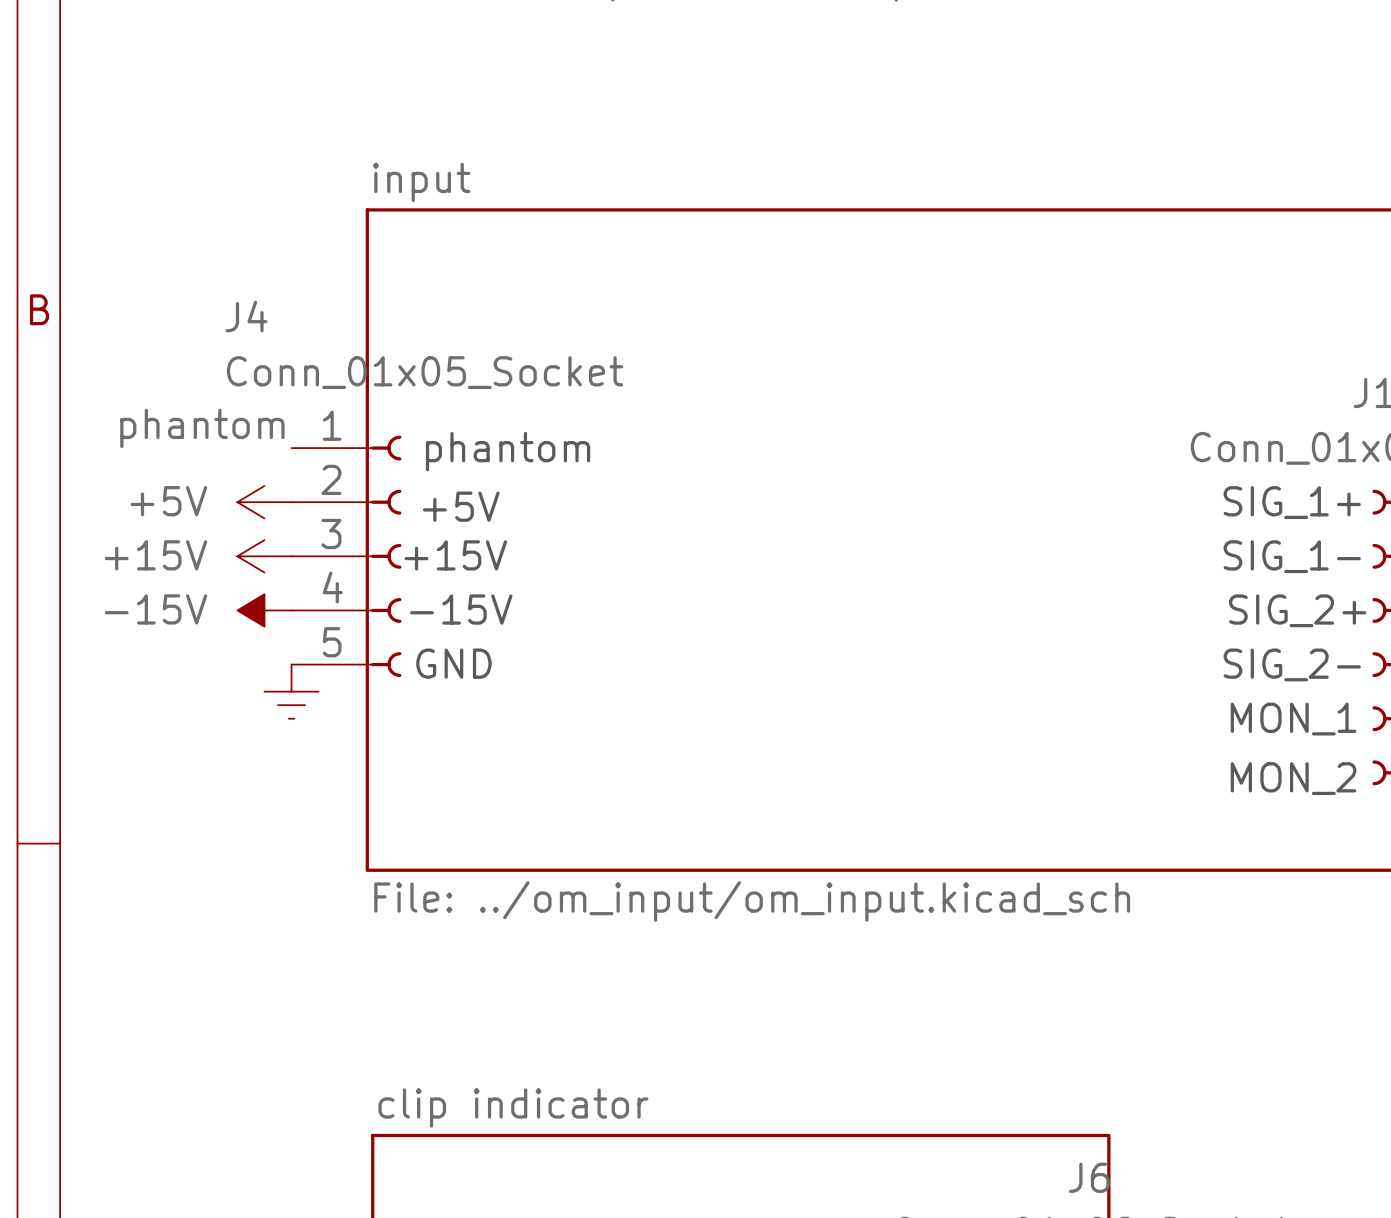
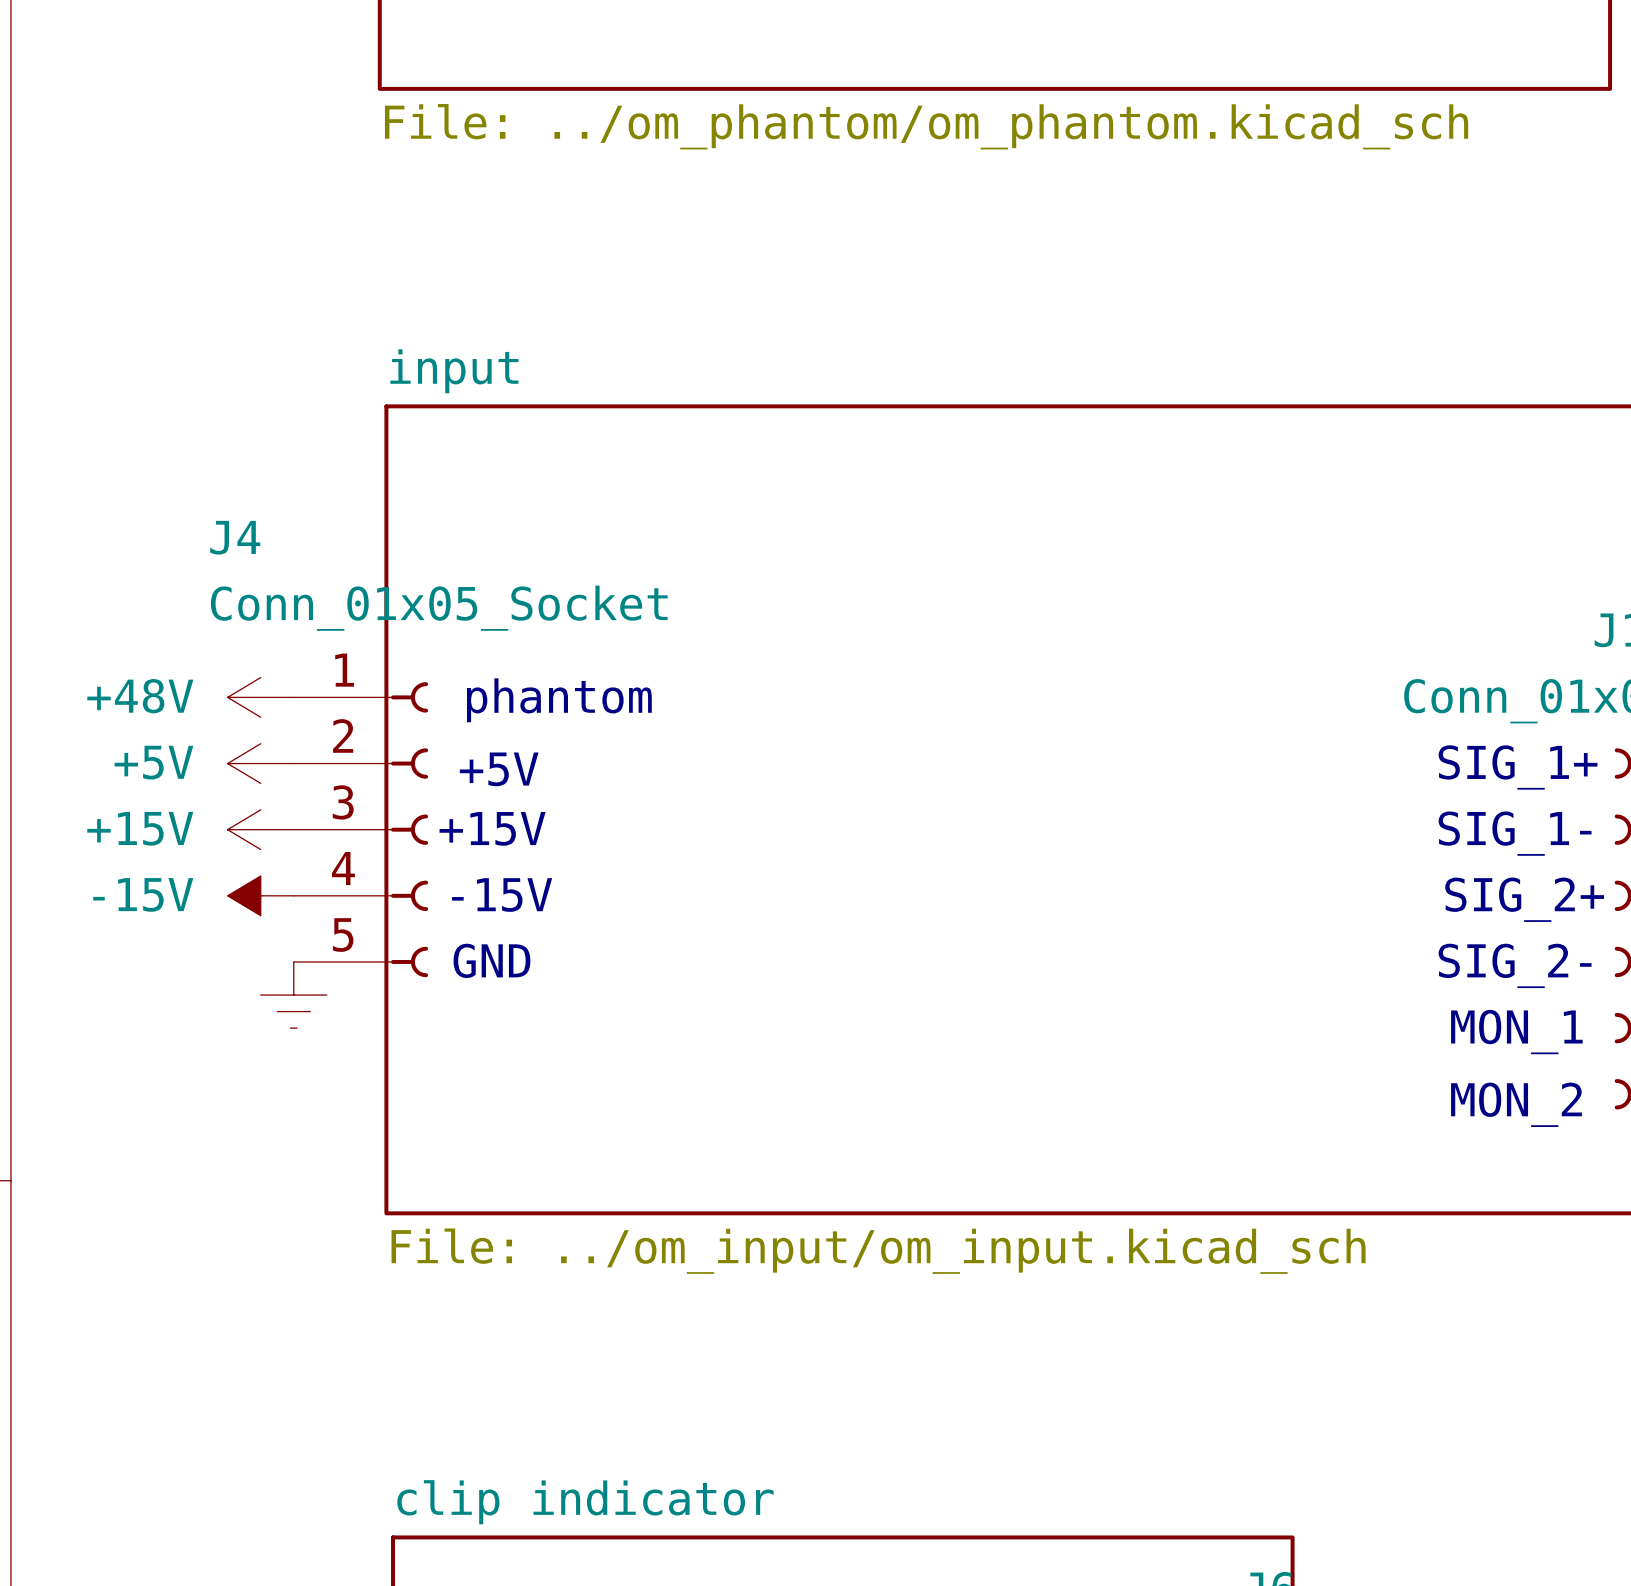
label: phantom (202, 428) -> none
power symbol: none -> +48V (260, 697)

